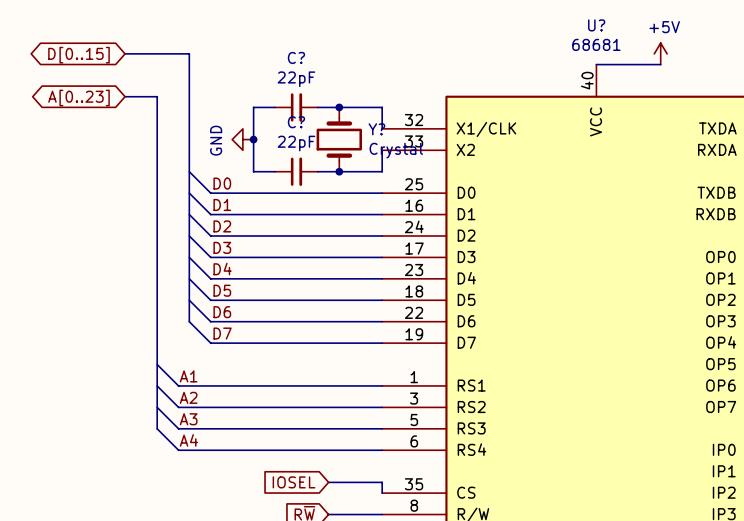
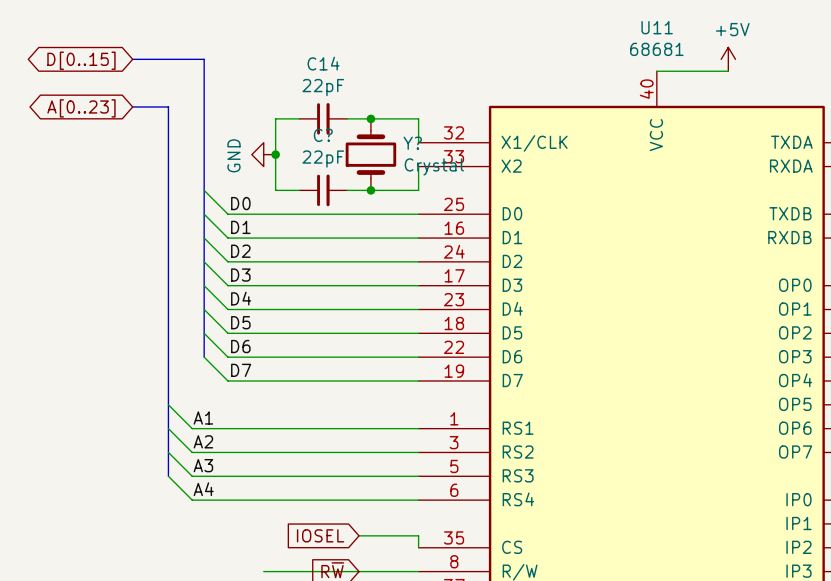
U? name: U? (596, 25) -> U11 (657, 27)
C? name: C? (296, 57) -> C14 (323, 63)
wire: none -> (263, 571) (359, 571)

